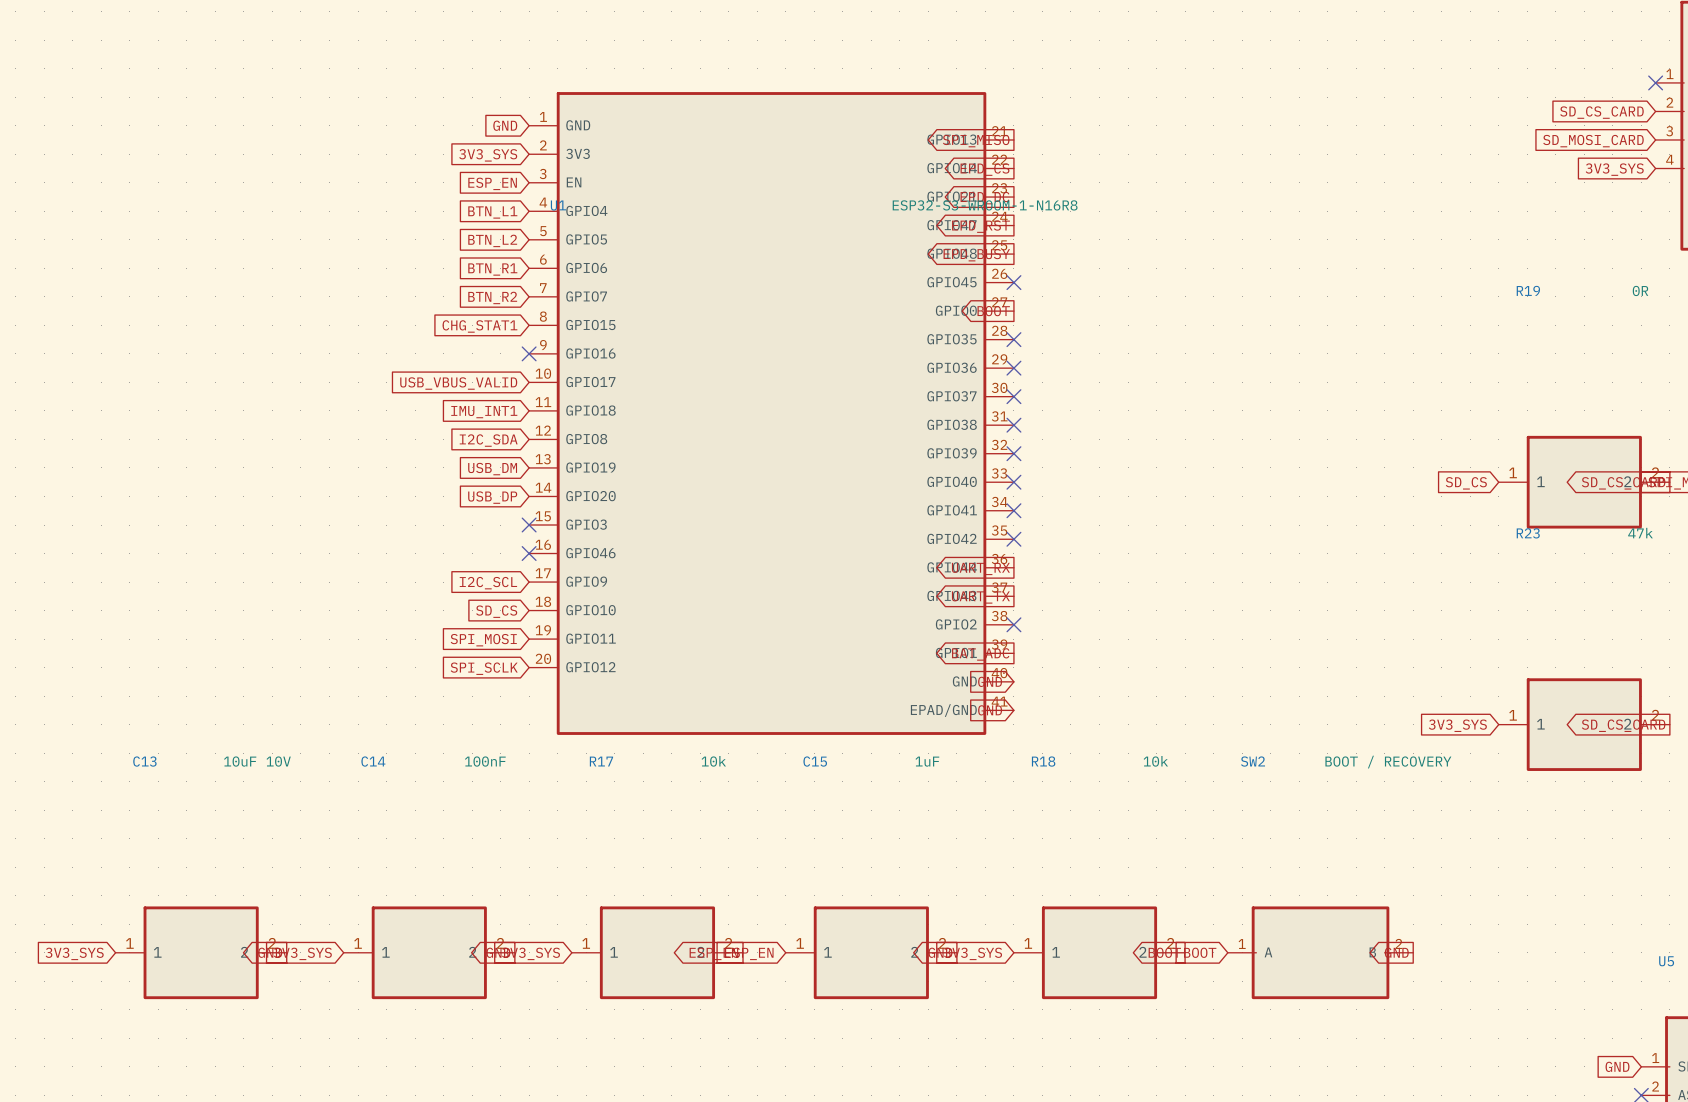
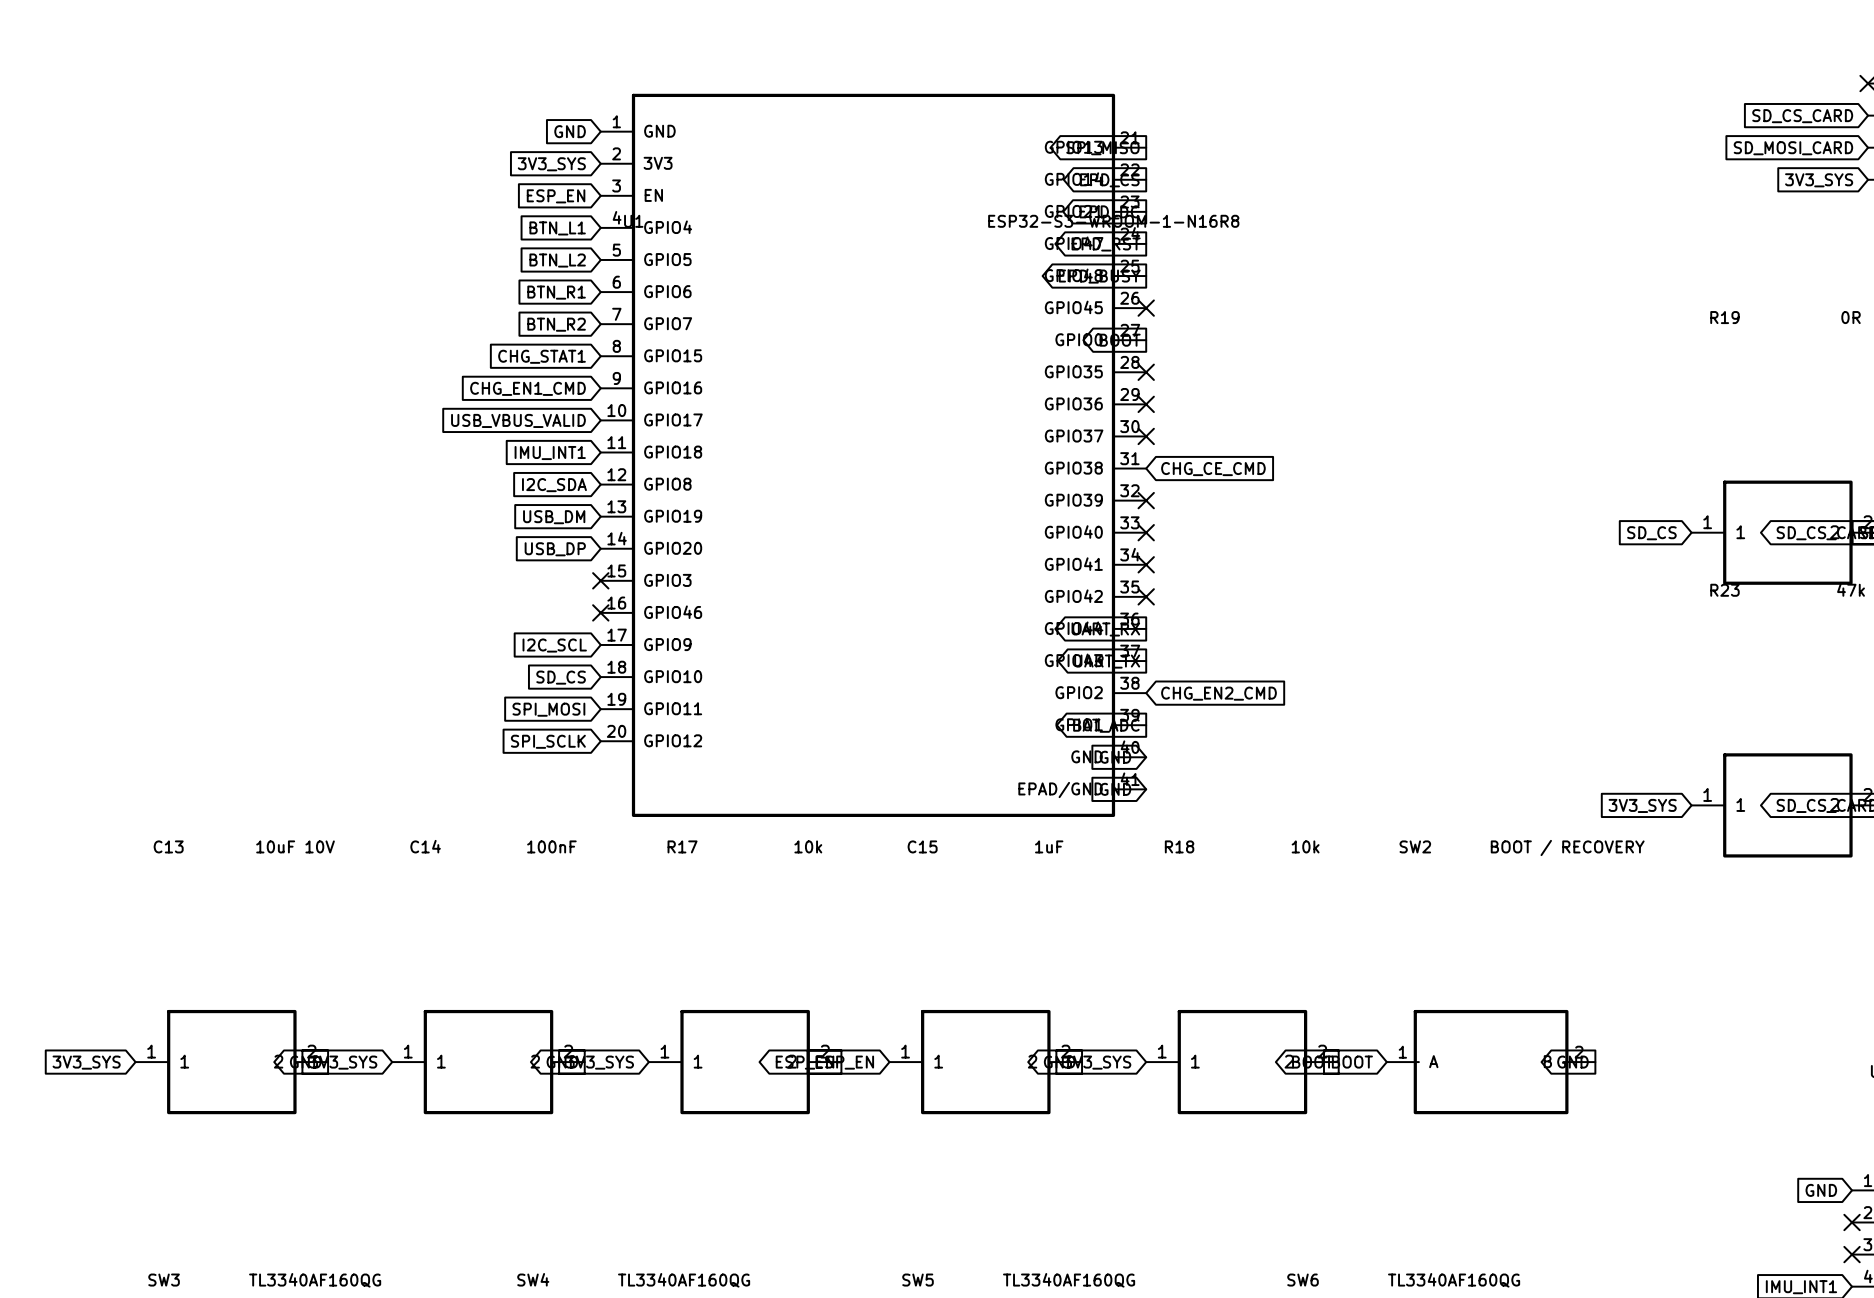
no-connect mark: (529, 353) -> none
global label: none -> CHG_EN1_CMD (527, 388)
no-connect mark: (1013, 425) -> none
global label: none -> CHG_CE_CMD (1213, 469)
no-connect mark: (1013, 624) -> none
global label: none -> CHG_EN2_CMD (1218, 693)

